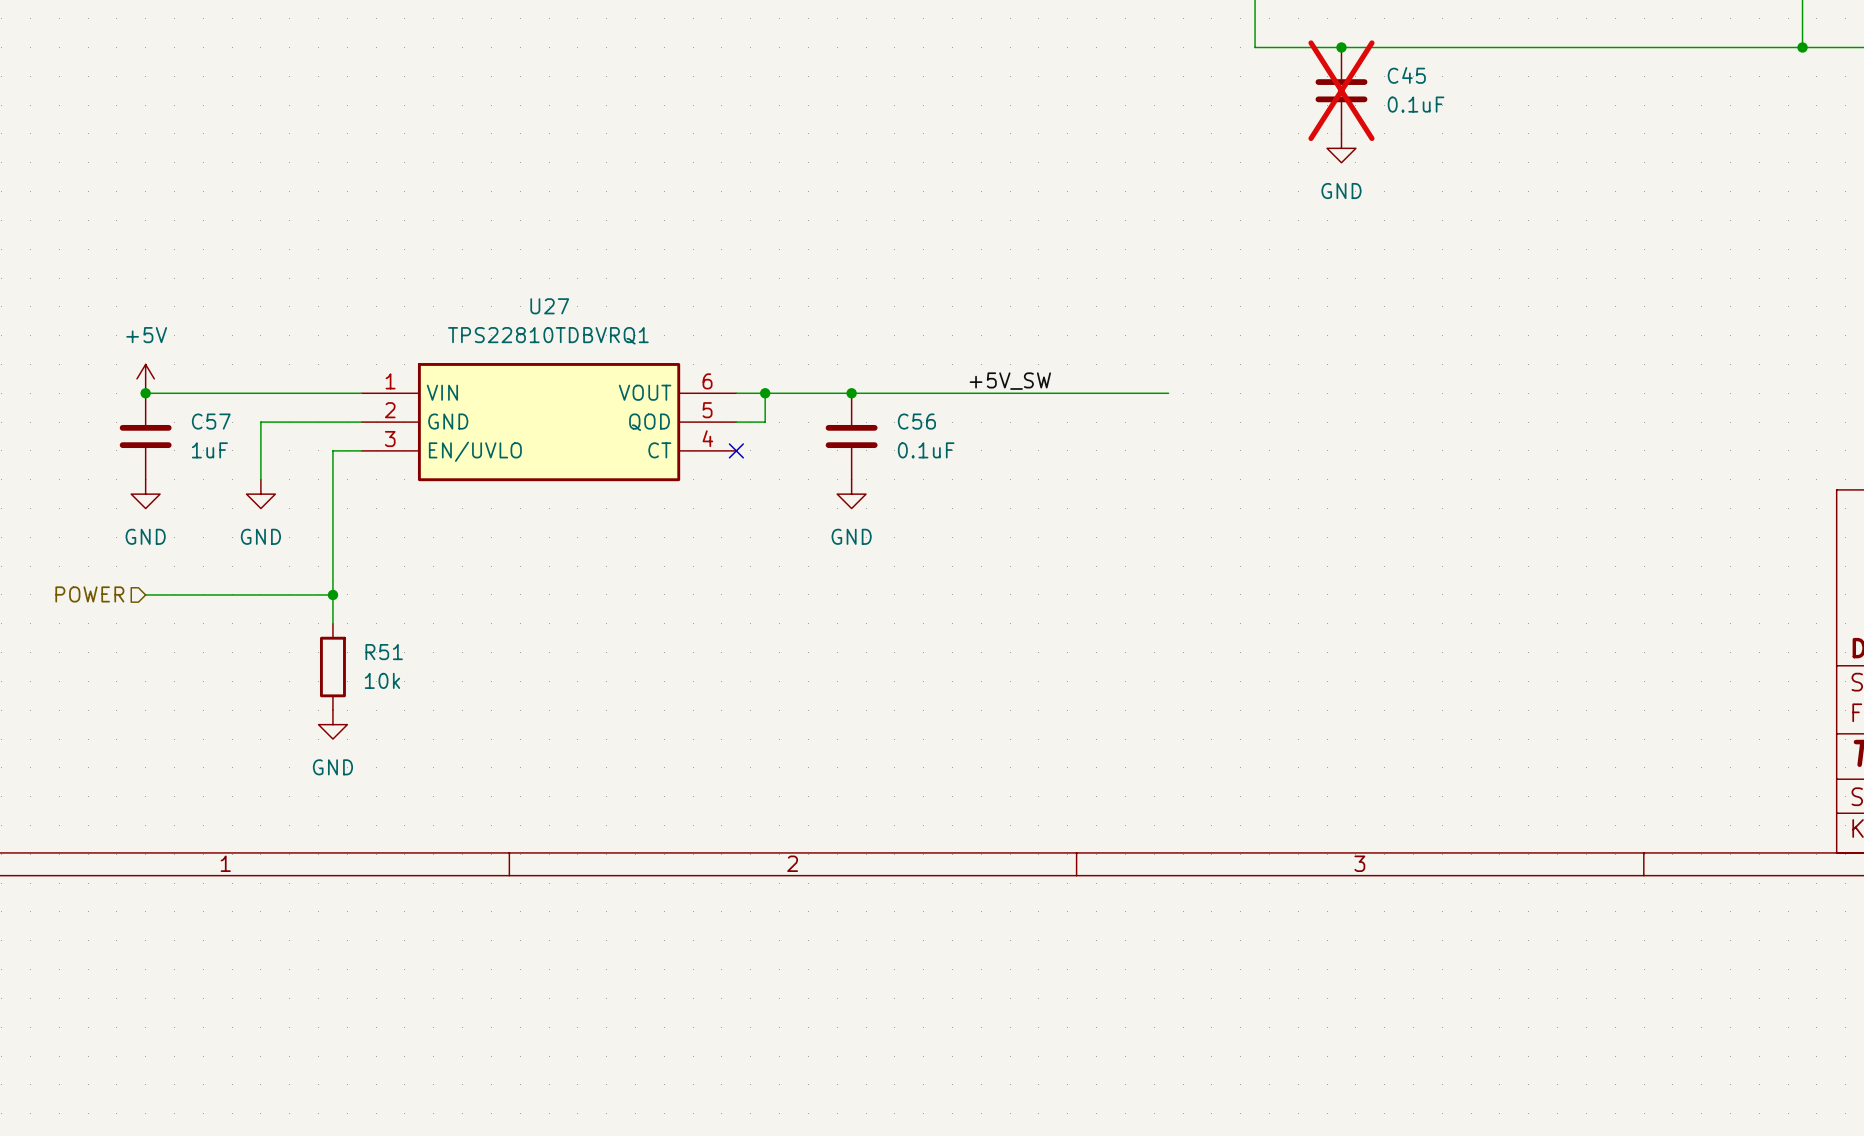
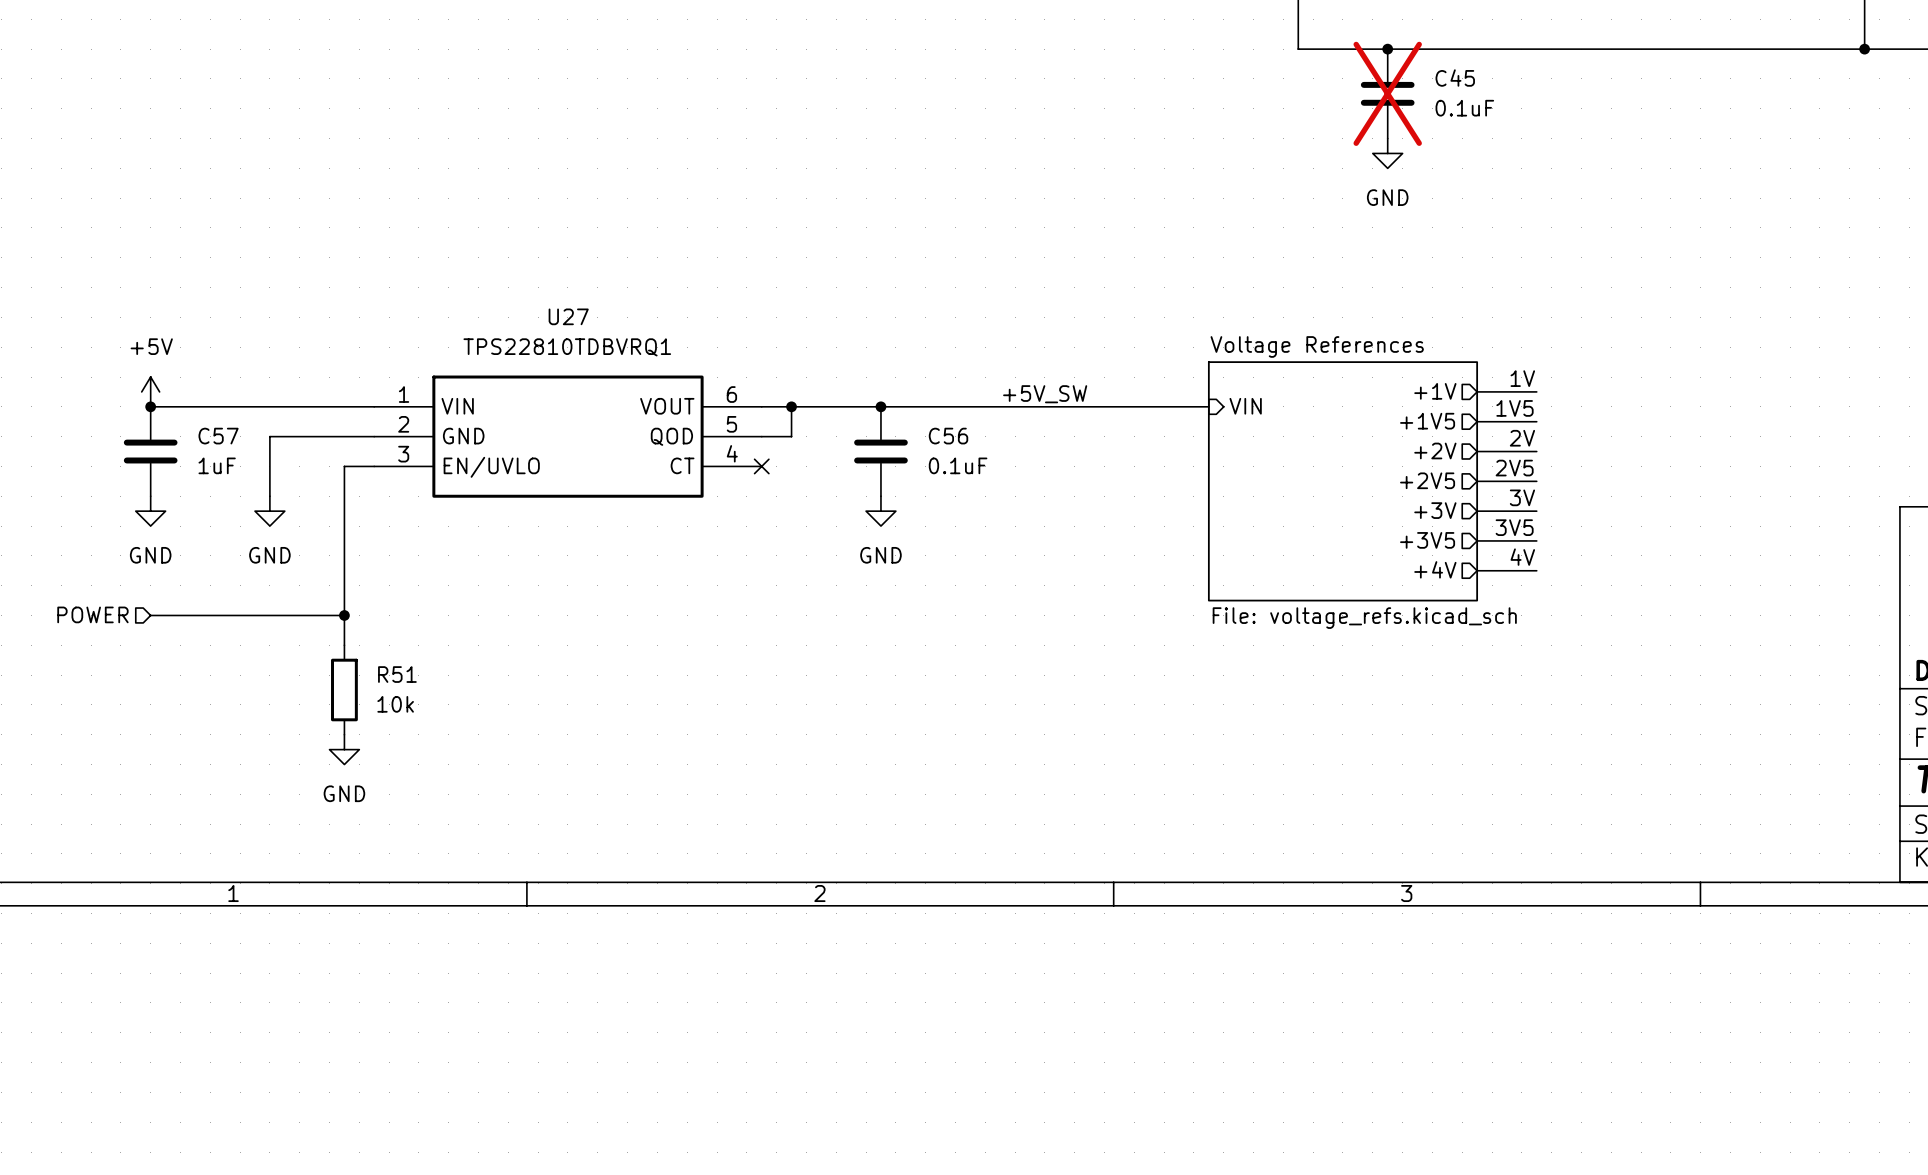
label: none -> 1V (1522, 378)
sheet pin: none -> +1V (1435, 391)
wire: none -> (1477, 391) (1536, 391)
sheet pin: none -> VIN (1245, 406)
label: none -> 1V5 (1514, 408)
sheet pin: none -> +1V5 (1427, 421)
wire: none -> (1477, 421) (1536, 421)
label: none -> 2V (1522, 438)
sheet pin: none -> +2V (1435, 450)
wire: none -> (1477, 451) (1536, 451)
label: none -> 2V5 (1514, 468)
sheet pin: none -> +2V5 (1427, 480)
sheet Voltage References: none -> File: voltage_refs.kicad_sch (1342, 481)
wire: none -> (1477, 481) (1536, 481)
label: none -> 3V (1522, 497)
sheet pin: none -> +3V (1435, 510)
wire: none -> (1477, 511) (1536, 511)
label: none -> 3V5 (1514, 527)
sheet pin: none -> +3V5 (1427, 540)
wire: none -> (1477, 540) (1536, 540)
label: none -> 4V (1522, 557)
sheet pin: none -> +4V (1435, 569)
wire: none -> (1477, 570) (1536, 570)

